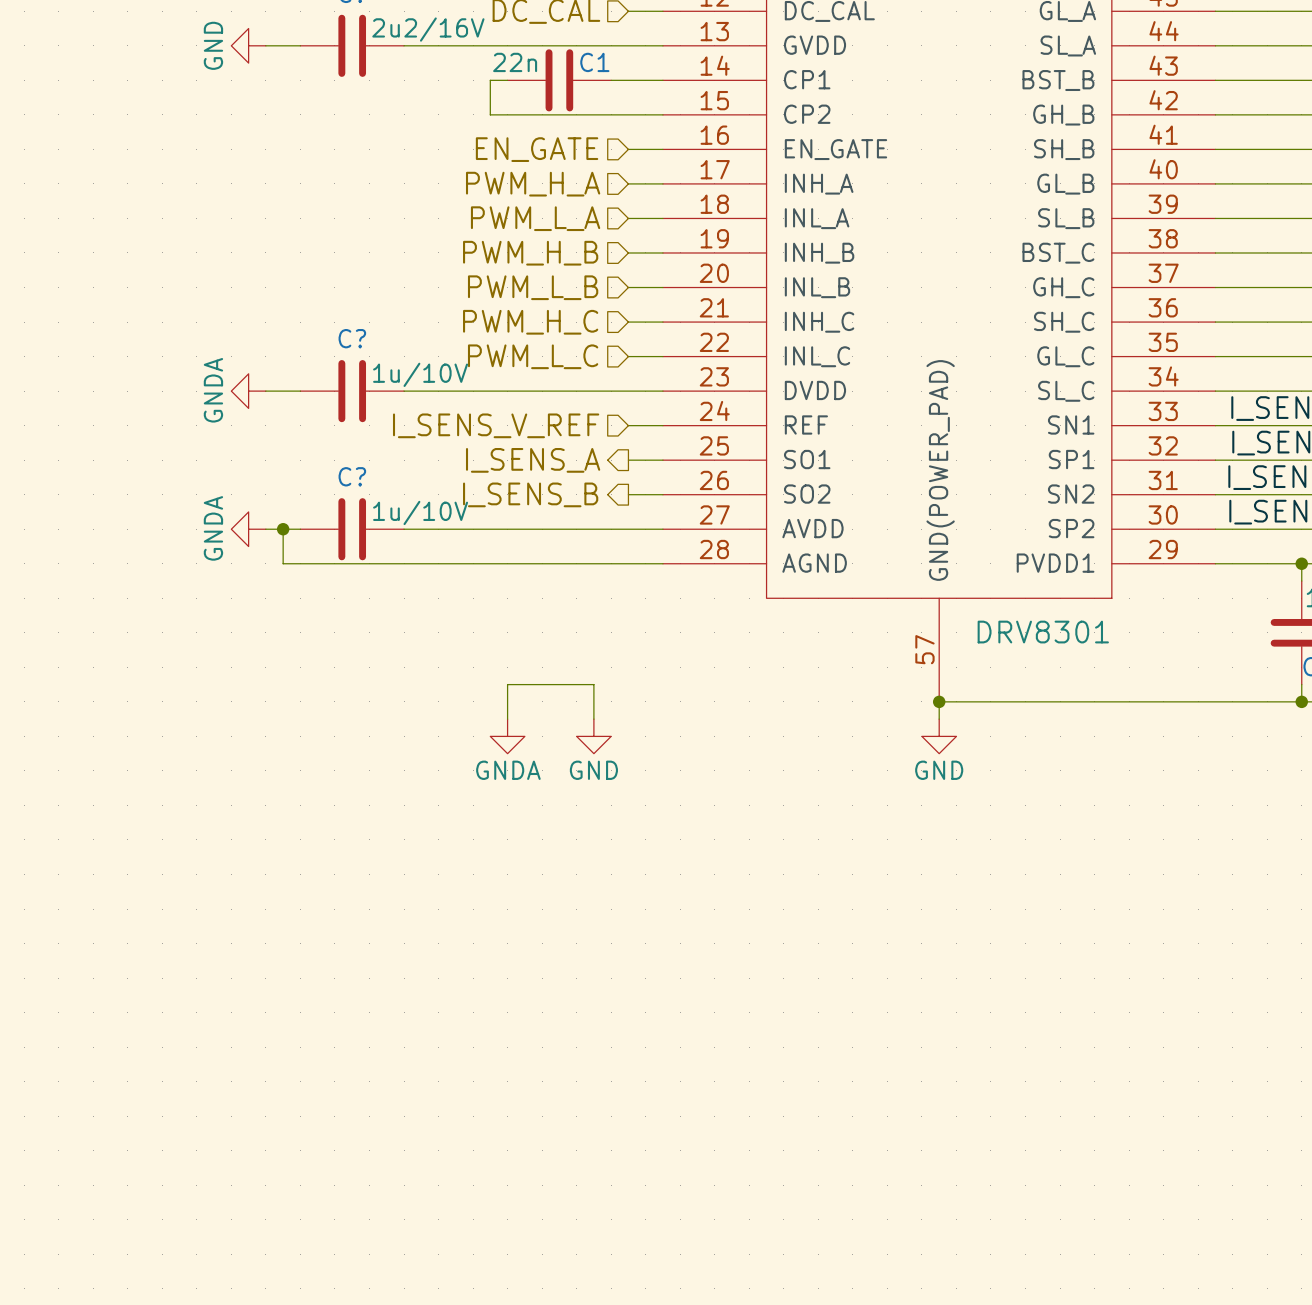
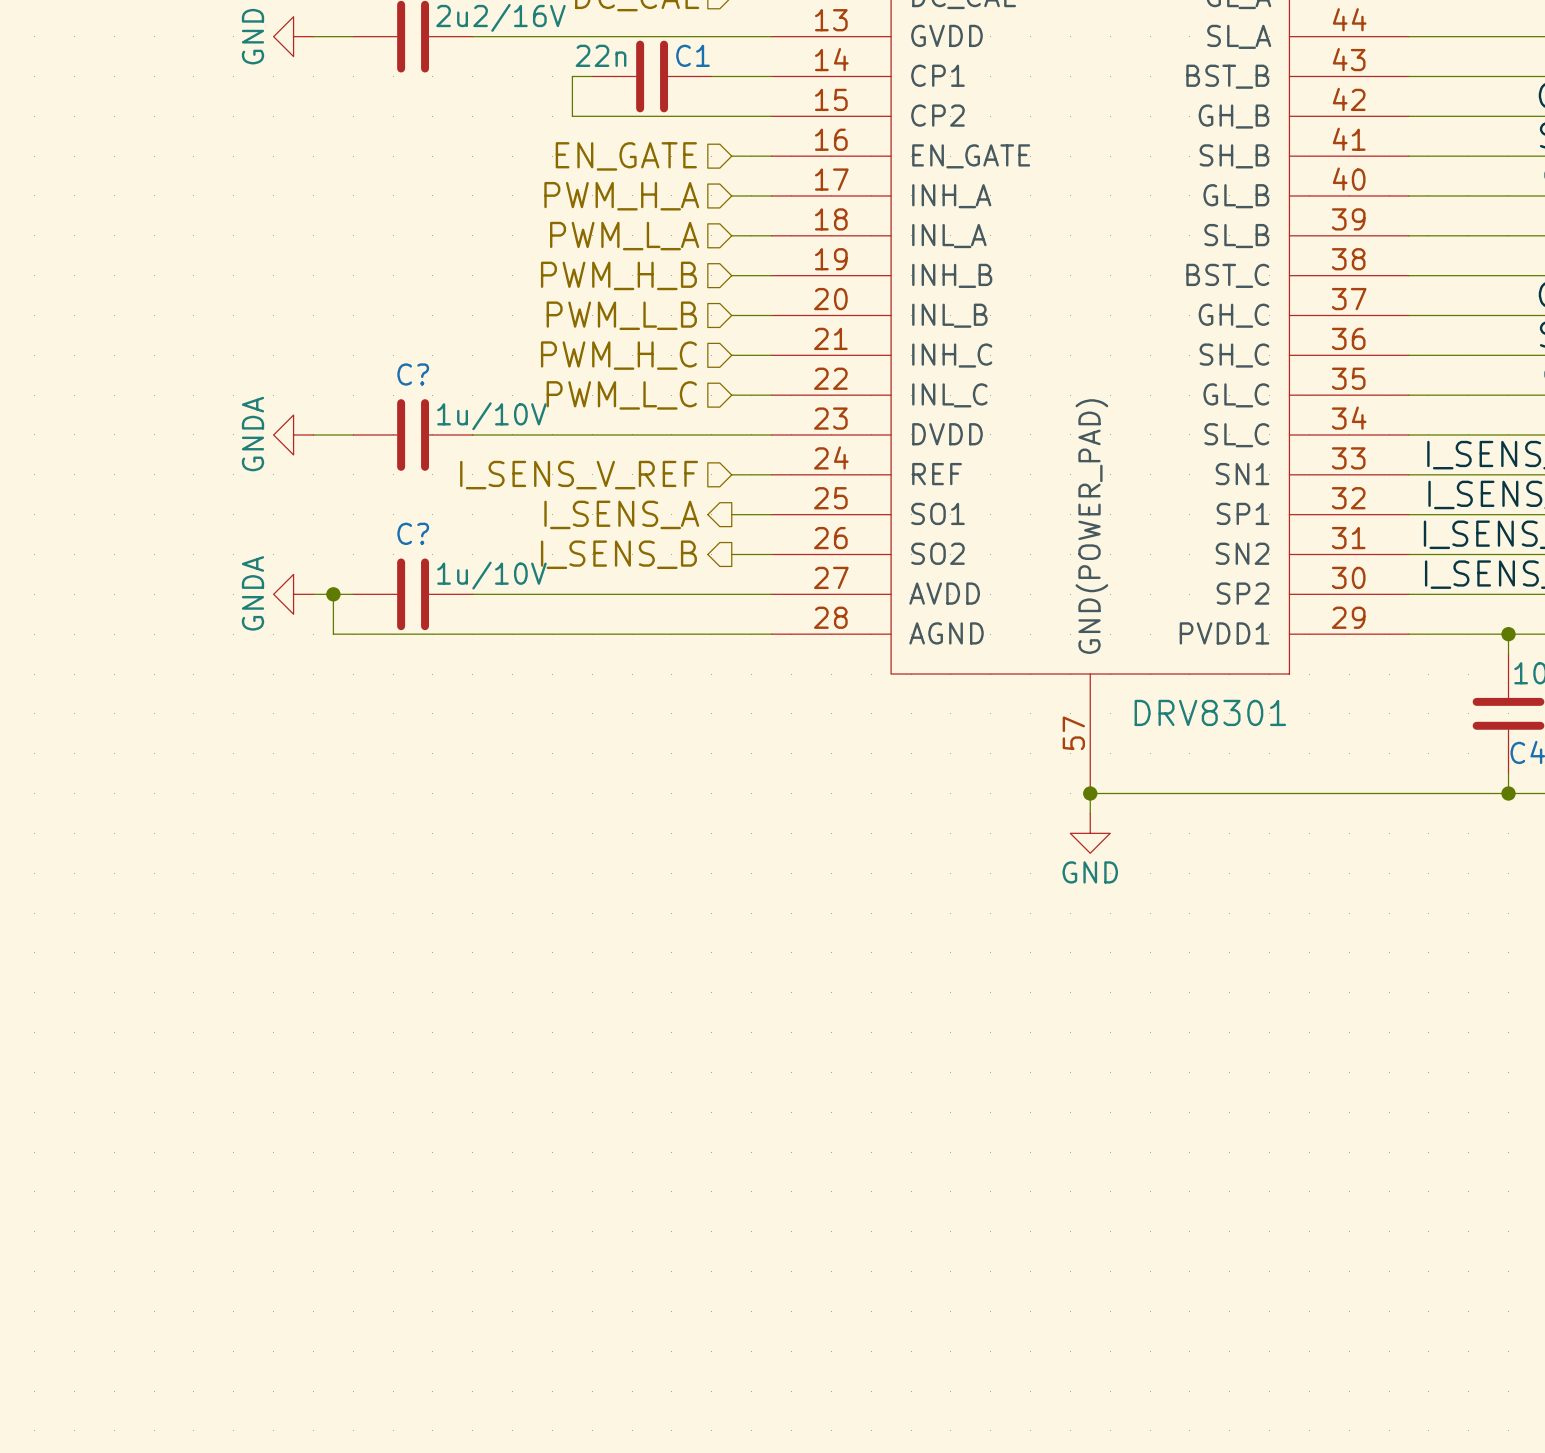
wire: (507, 719) (507, 684) (593, 684) (593, 719) -> none
power symbol: GNDA (507, 736) -> none
power symbol: GND (593, 736) -> none

